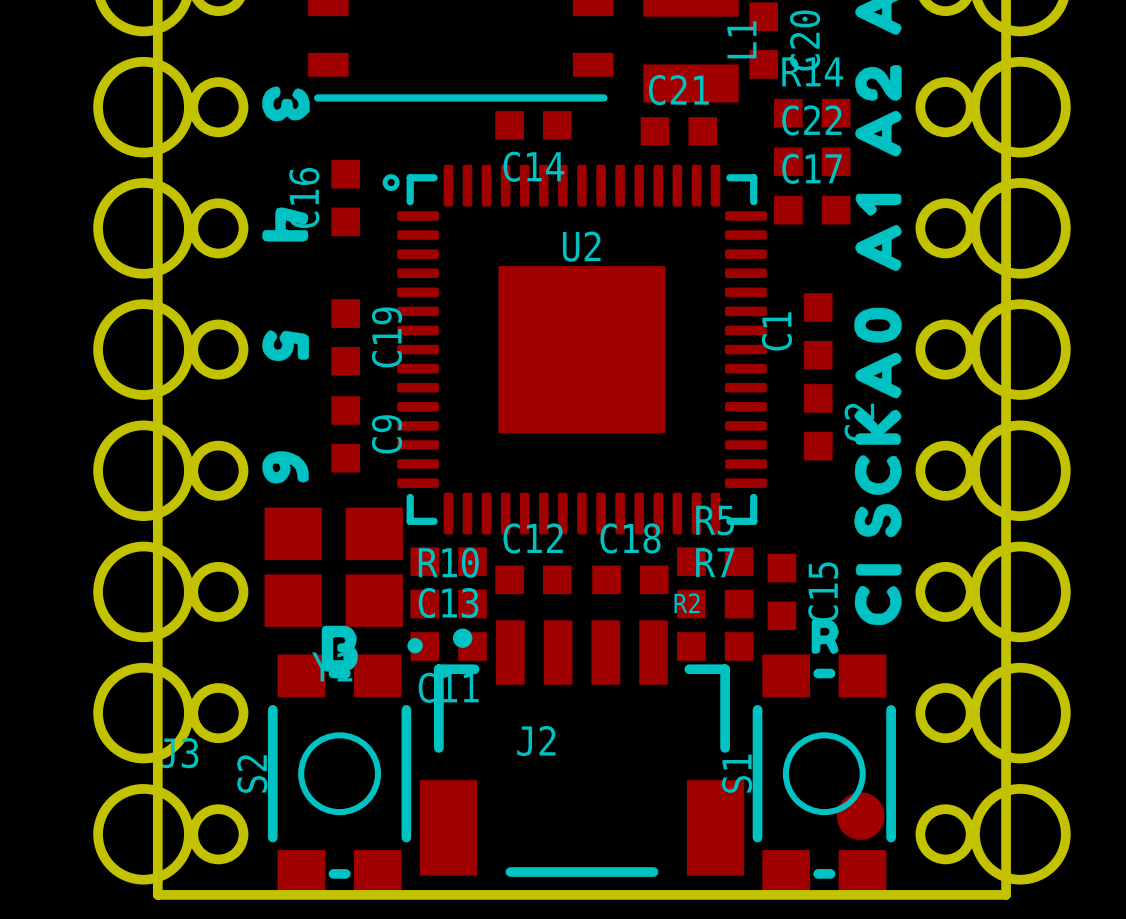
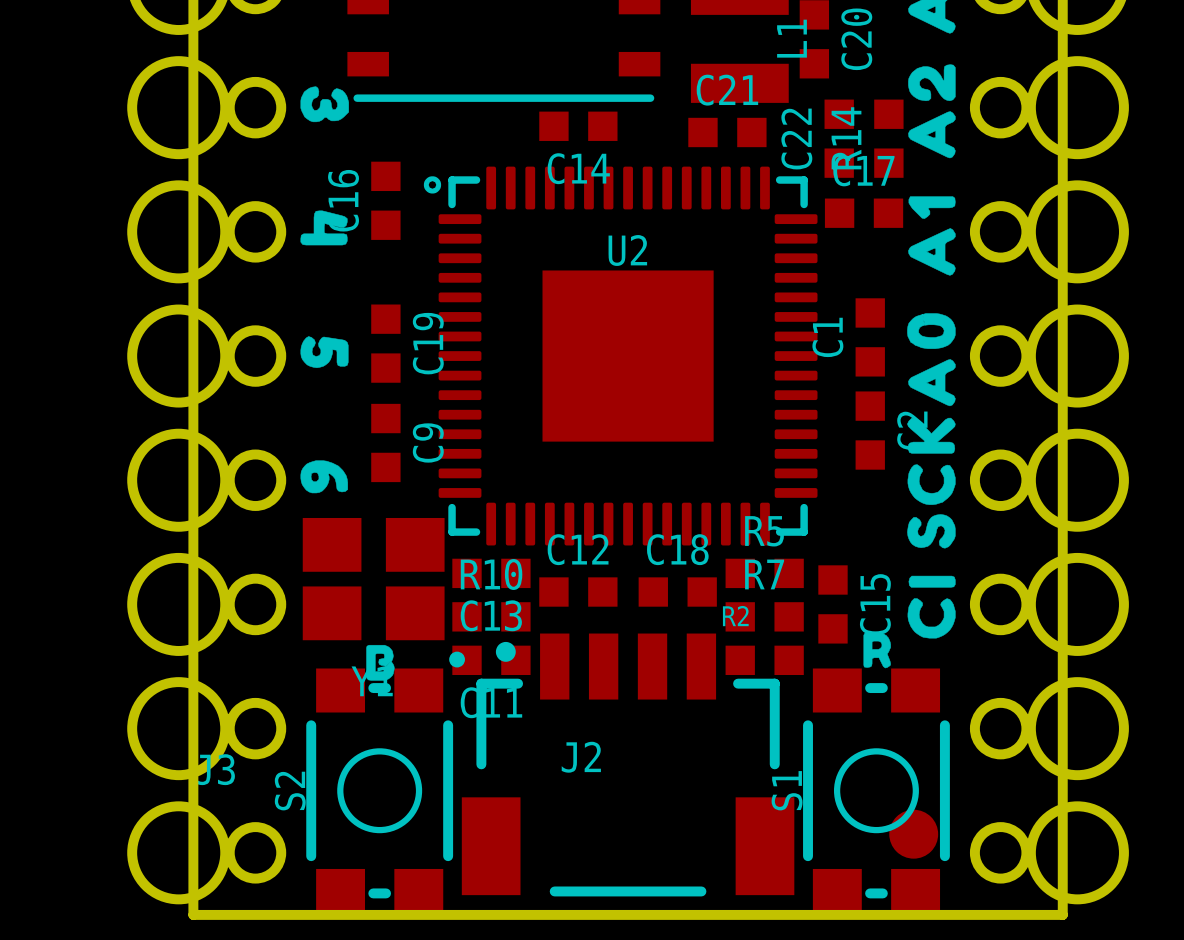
R14 rotation: 0° (812, 113) -> 90° clockwise (888, 138)
C22 rotation: 0° (812, 161) -> 90° clockwise (839, 138)
drawing shape: [321, 625, 358, 672] -> [366, 644, 395, 681]

